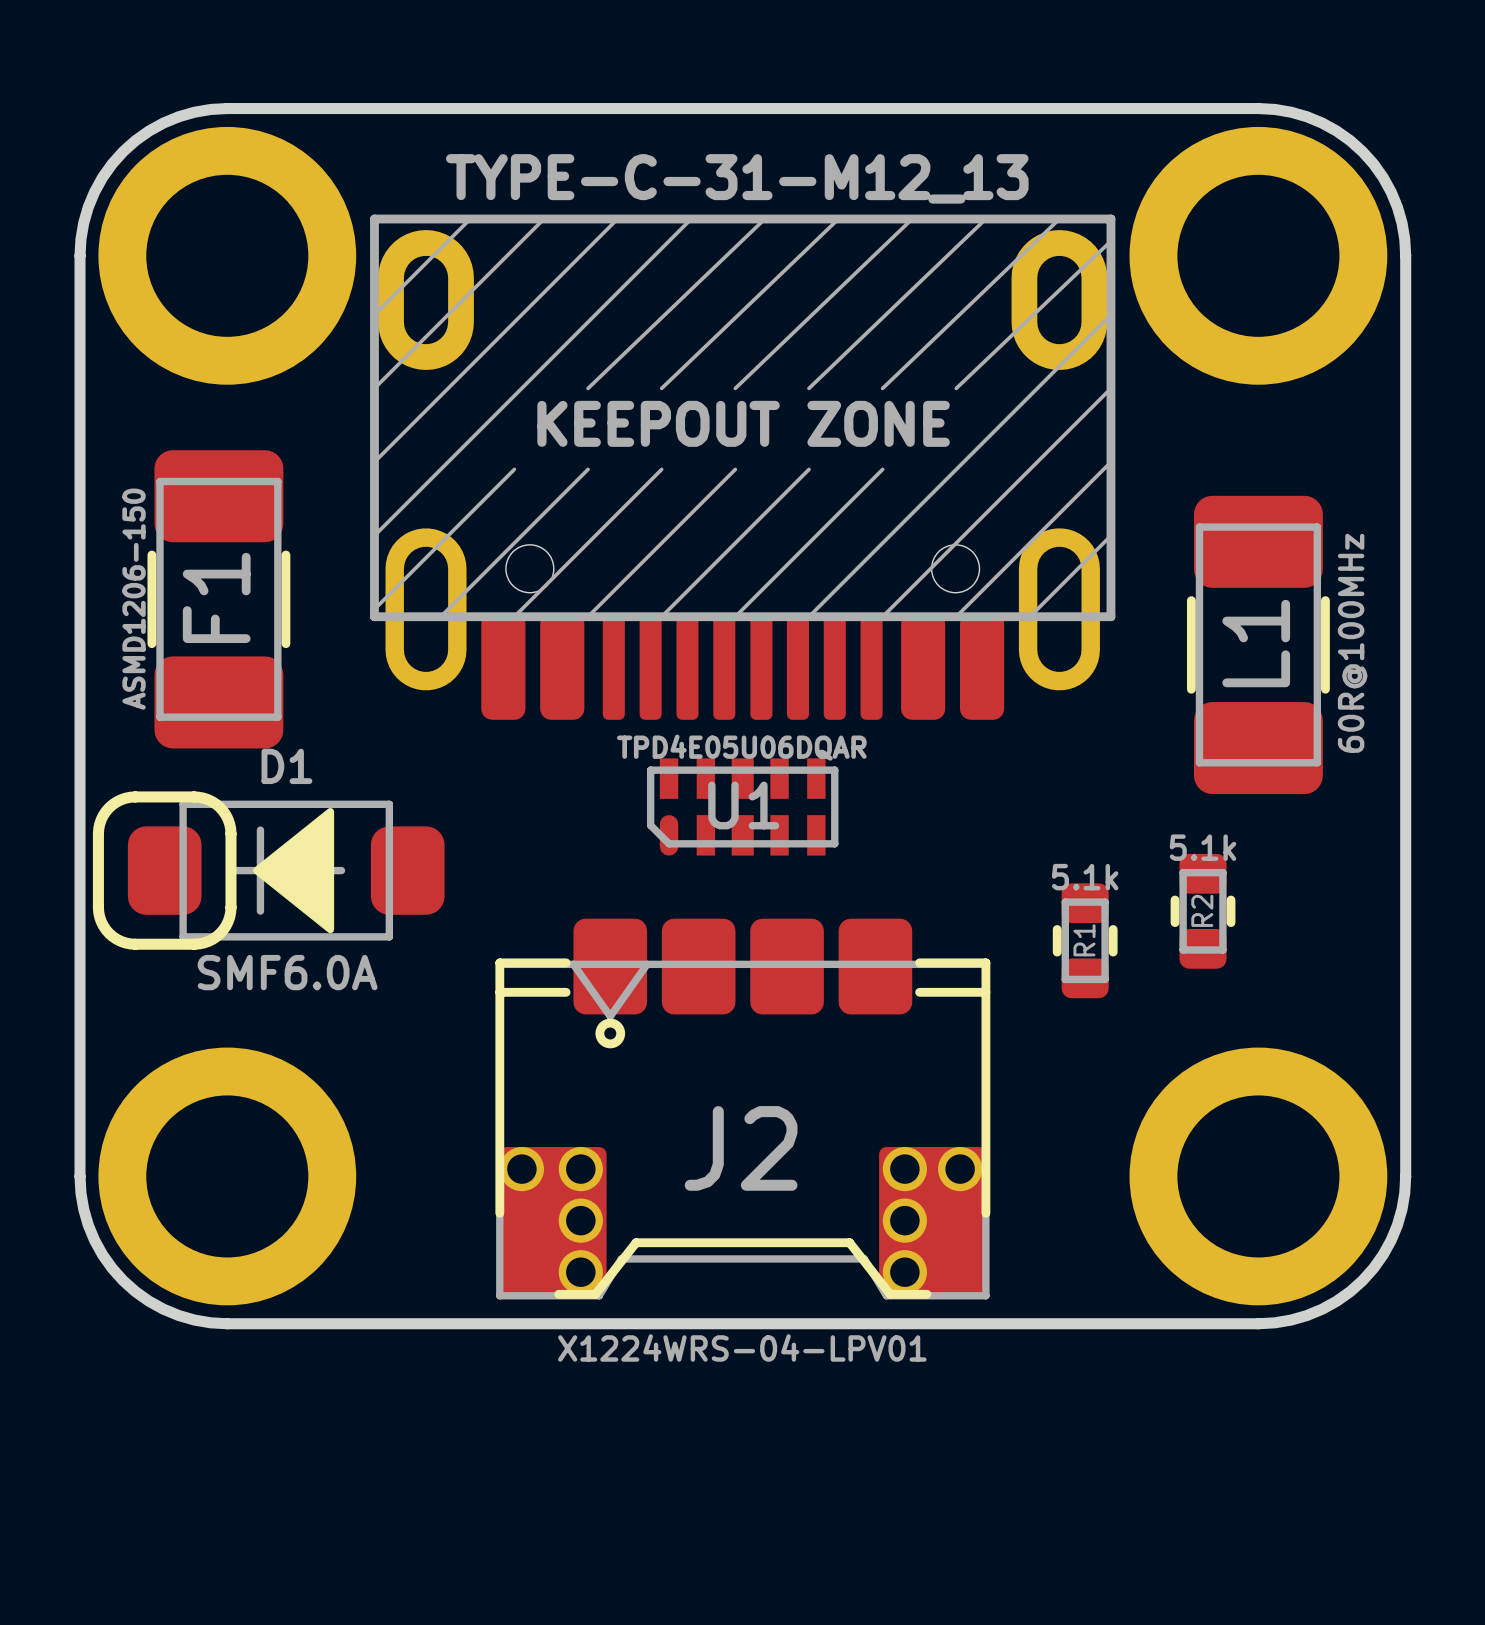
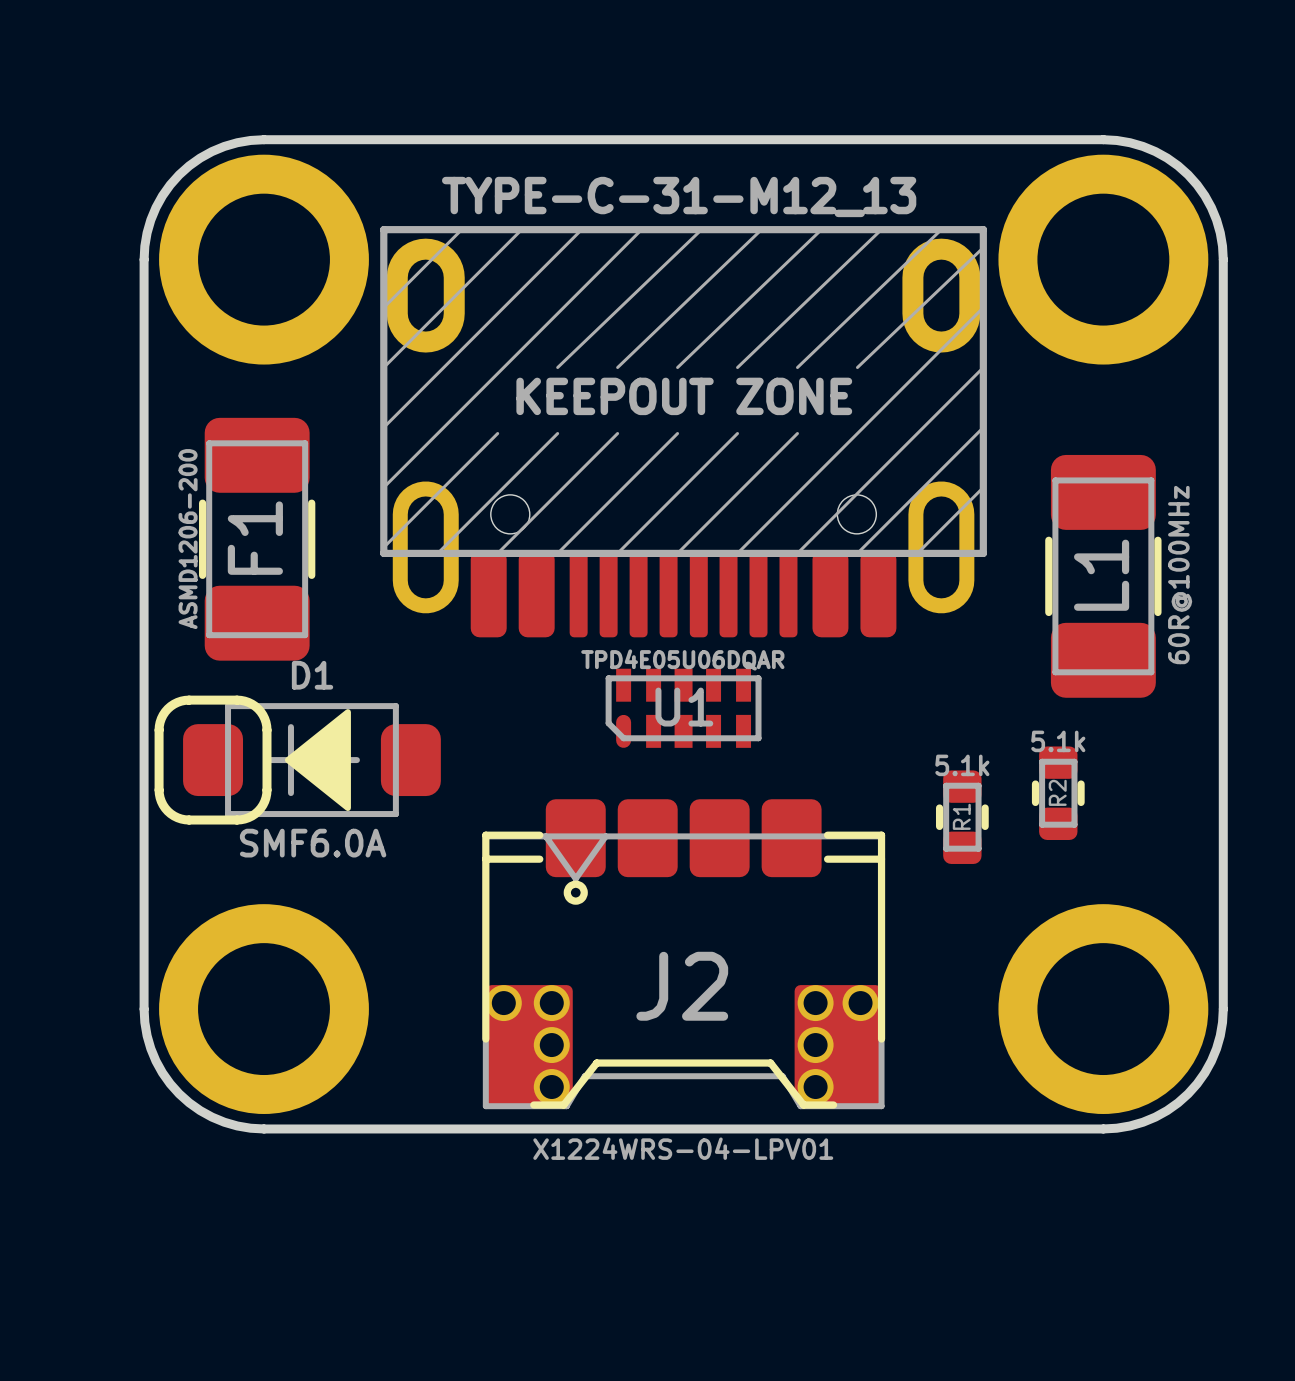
F1 value: ASMD1206-150 (134, 599) -> ASMD1206-200 (188, 539)

